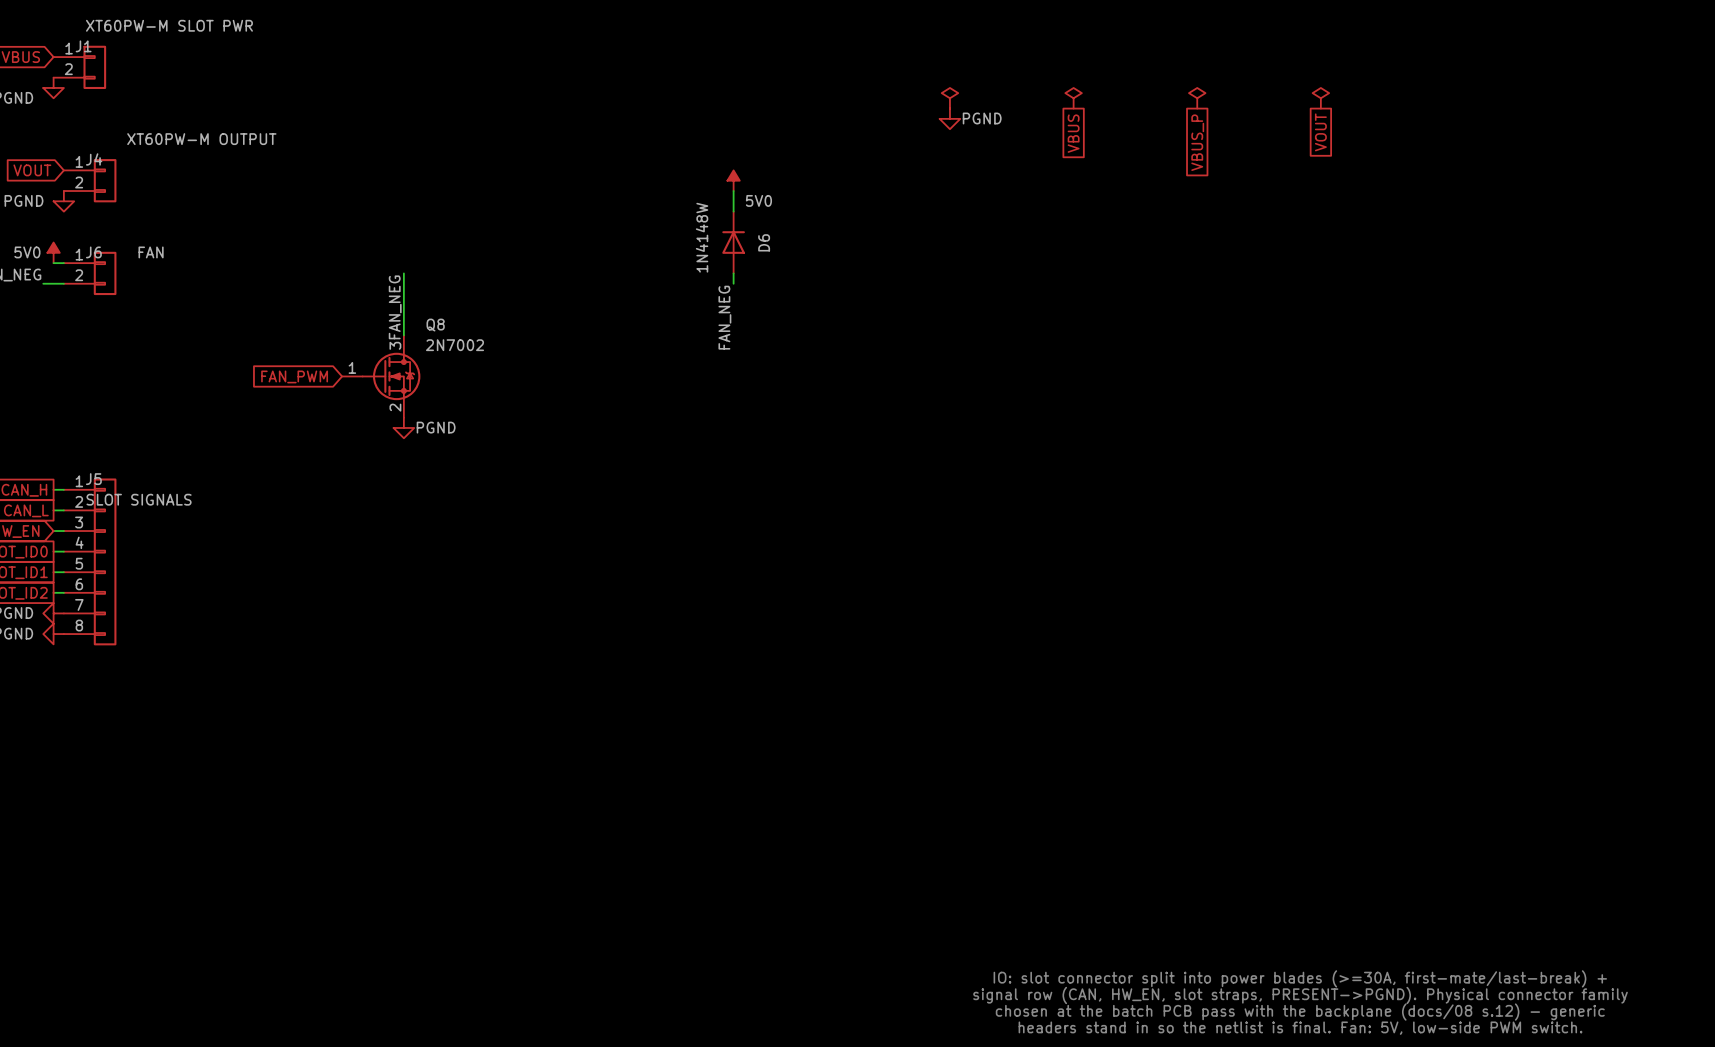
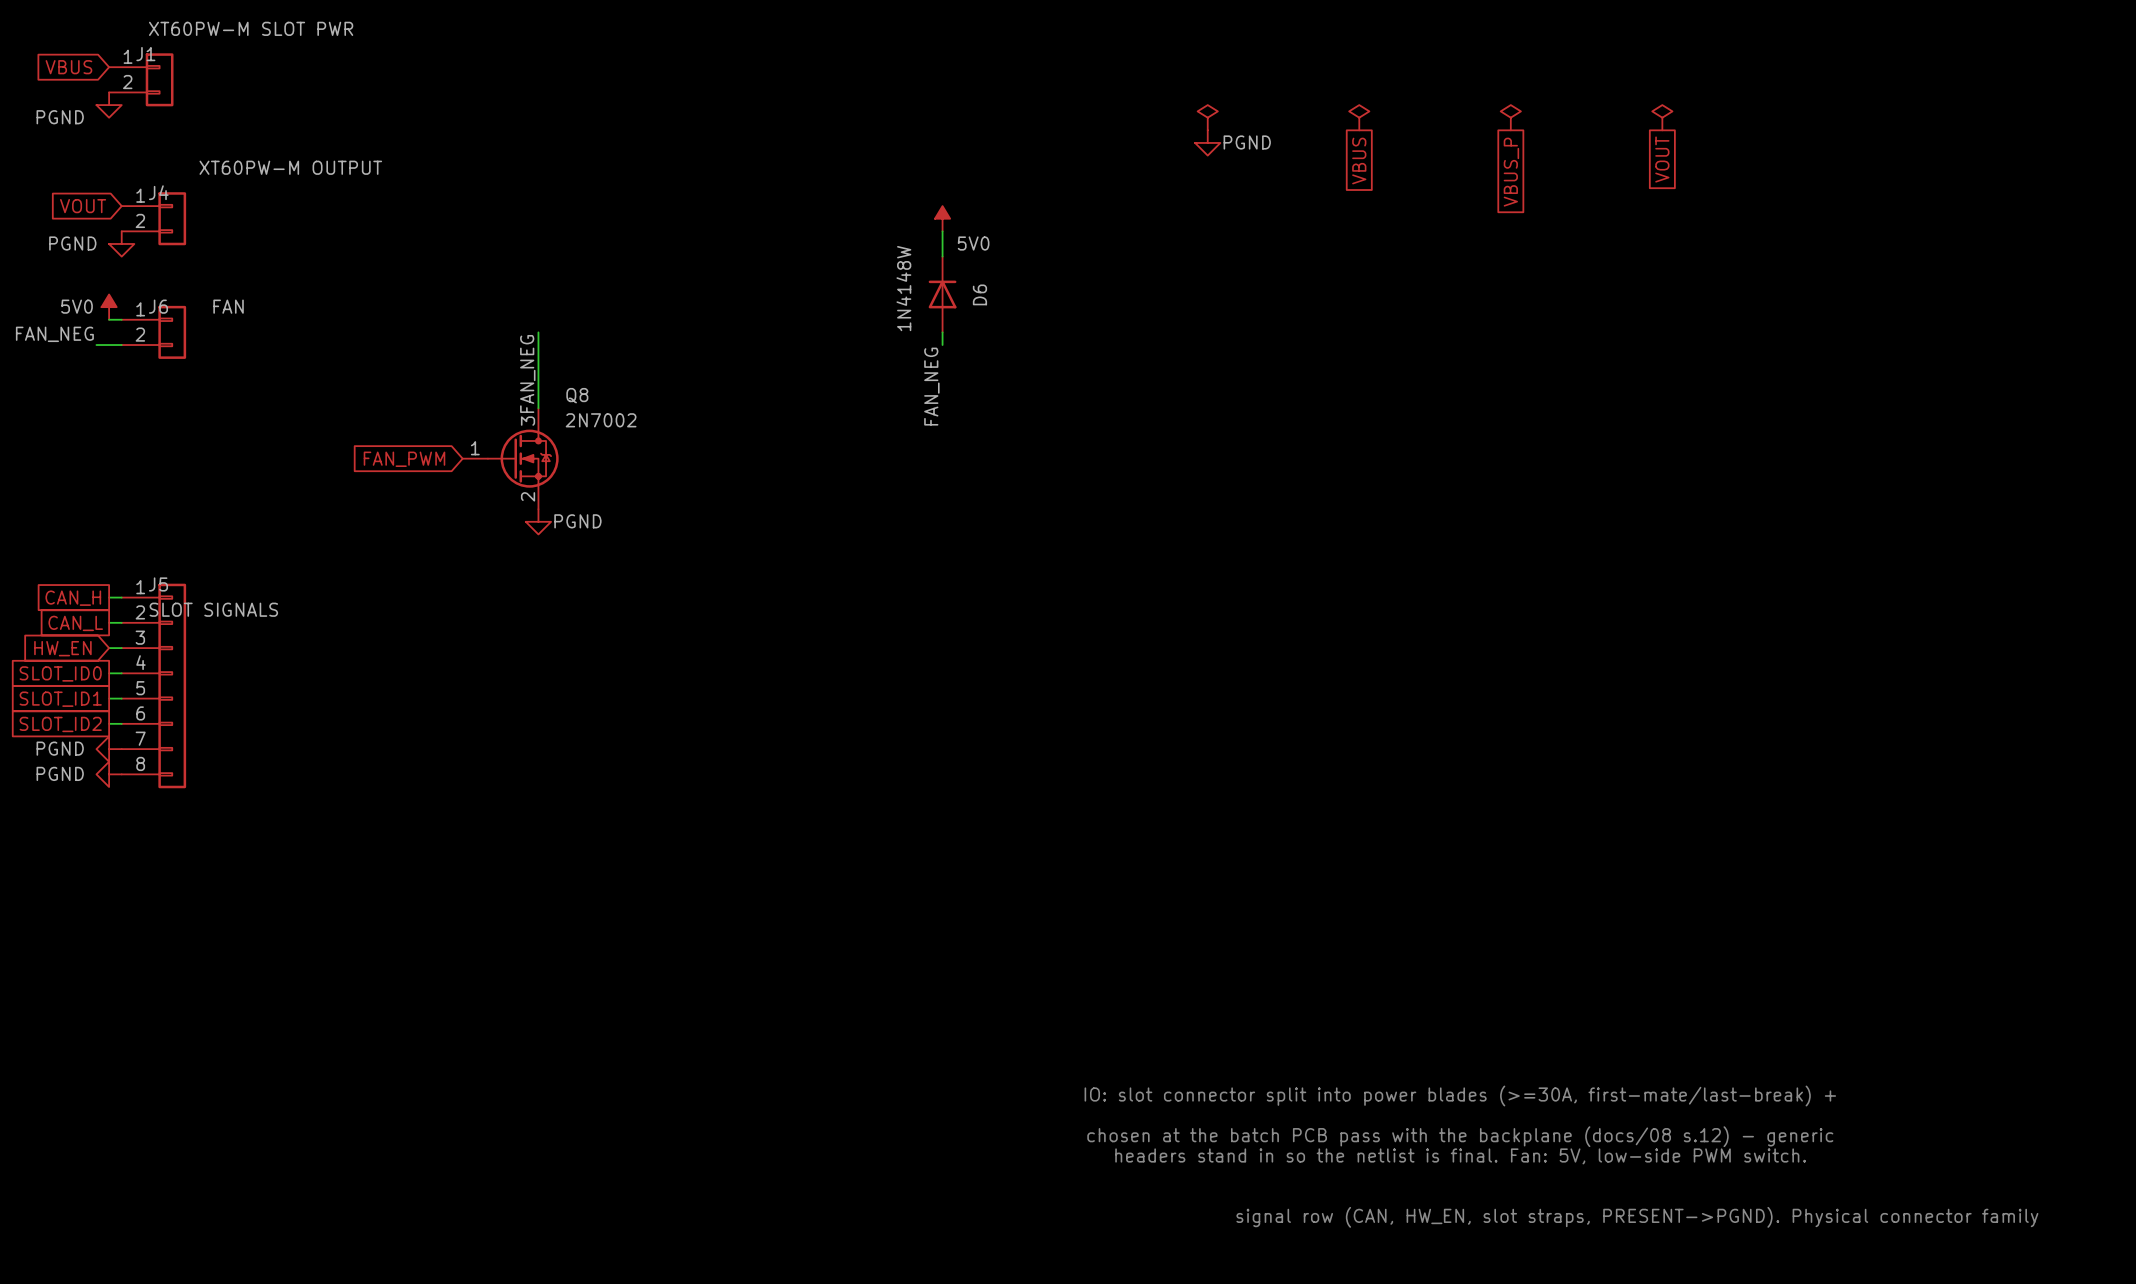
text position: IO: slot connector split into power blades (>=30A, first-mate/last-break) + (1300, 978) -> IO: slot connector split into power blades (>=30A, first-mate/last-break) + (1460, 1096)
text position: chosen at the batch PCB pass with the backplane (docs/08 s.12) - generic (1300, 1012) -> chosen at the batch PCB pass with the backplane (docs/08 s.12) - generic (1460, 1136)
text position: headers stand in so the netlist is final. Fan: 5V, low-side PWM switch. (1300, 1028) -> headers stand in so the netlist is final. Fan: 5V, low-side PWM switch. (1460, 1156)

